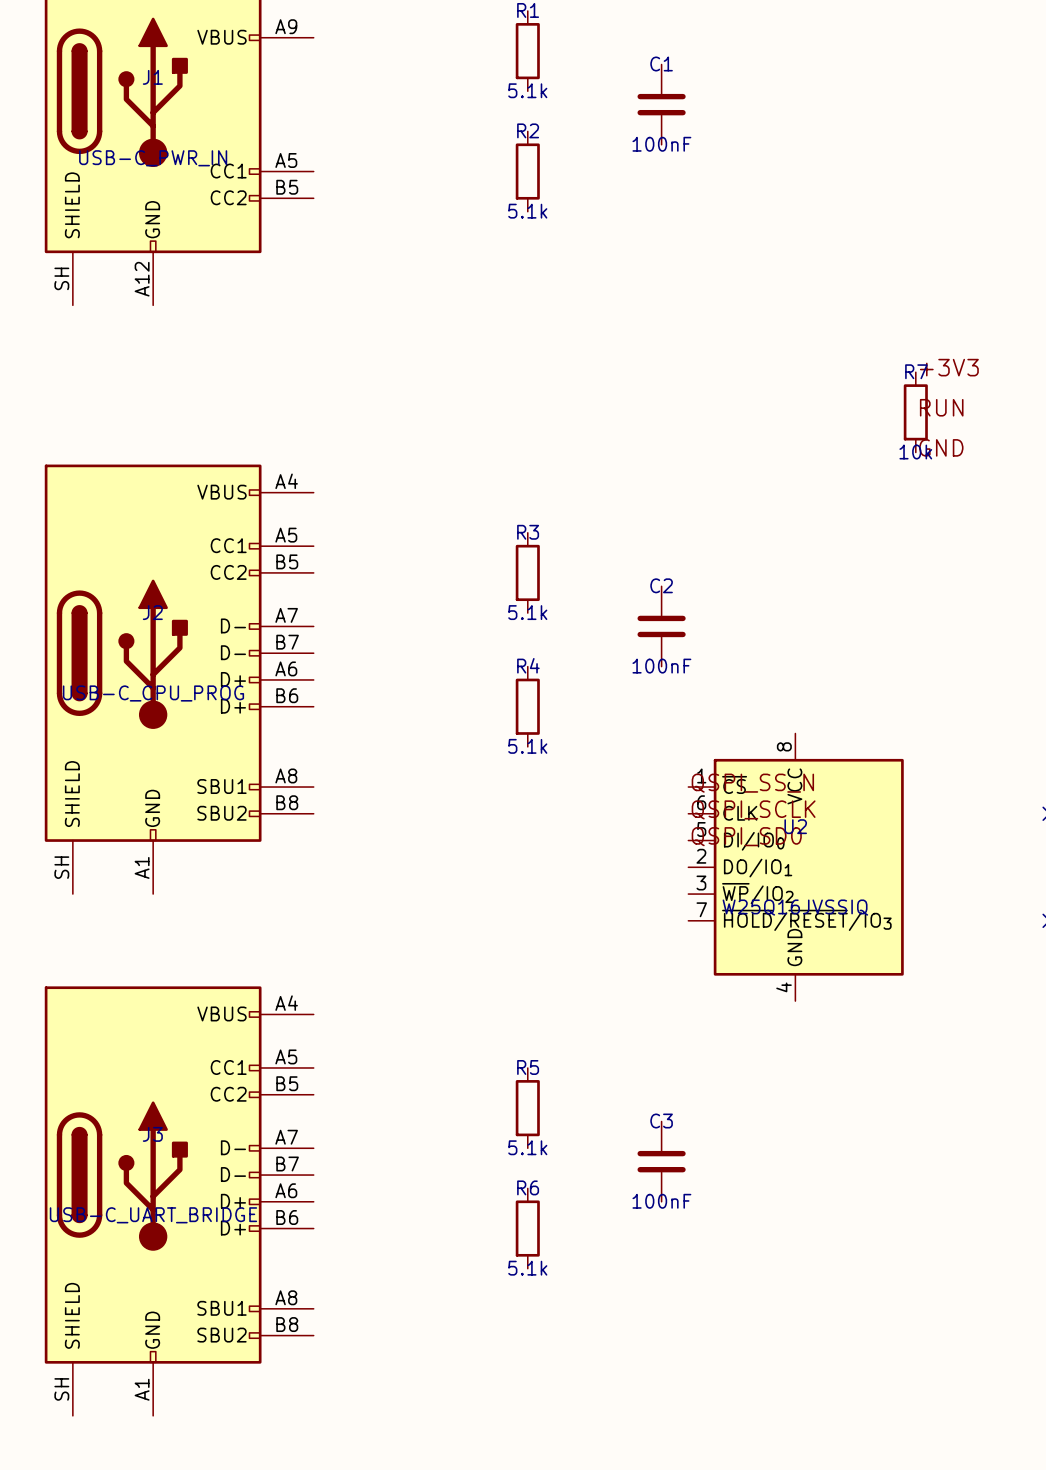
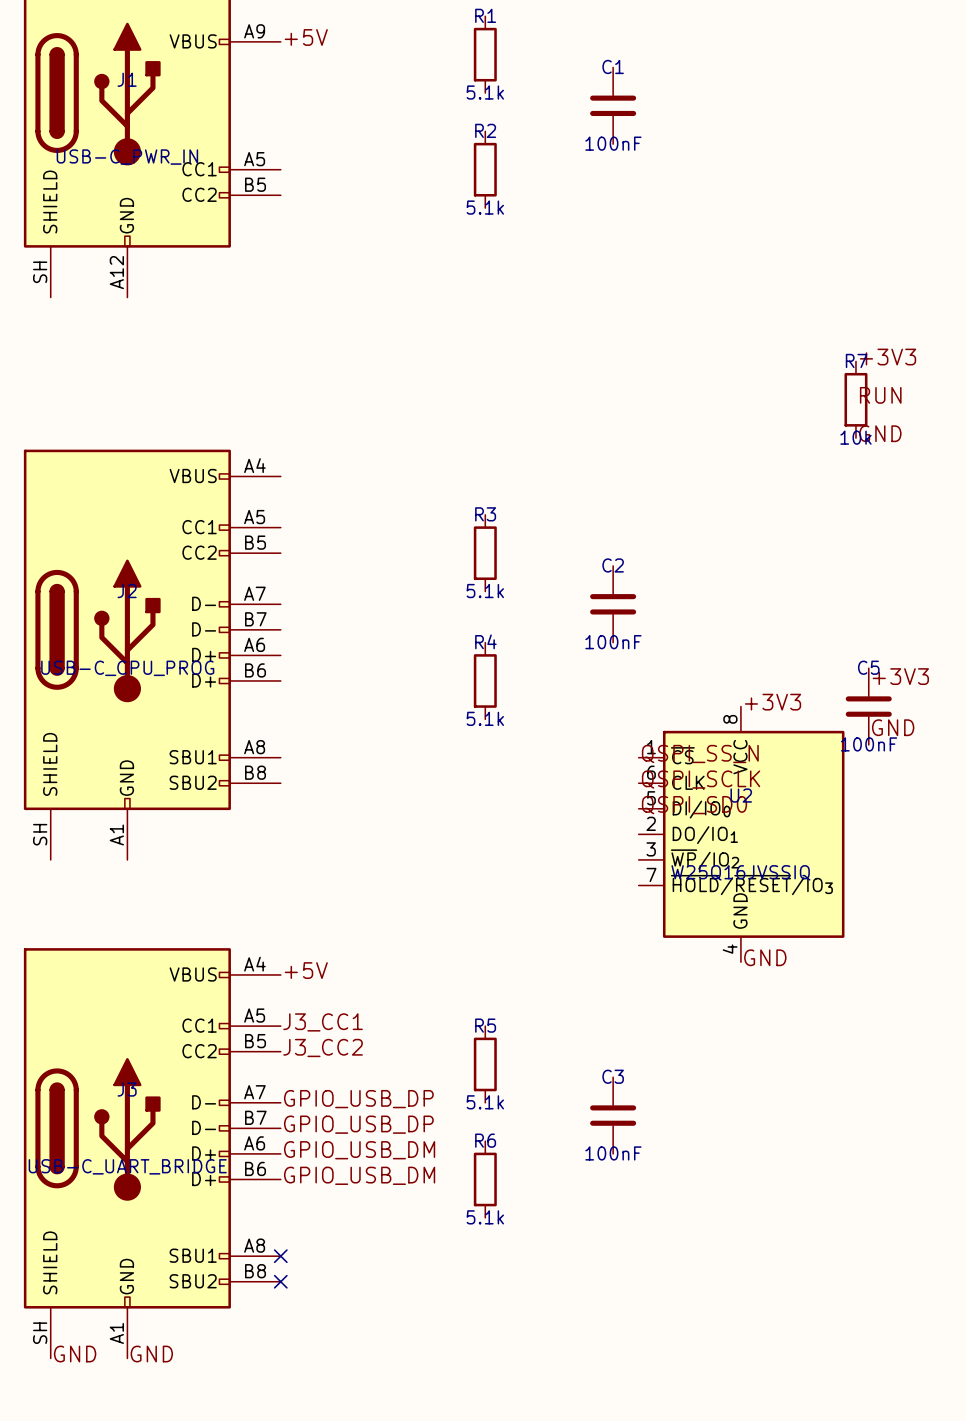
label: none -> +5V (306, 37)
label: none -> +3V3 (900, 676)
label: none -> +3V3 (772, 702)
C5: none -> 100nF (868, 706)
label: none -> GND (893, 727)
label: none -> GND (765, 957)
label: none -> +5V (306, 970)
label: none -> J3_CC1 (323, 1022)
label: none -> J3_CC2 (323, 1047)
label: none -> GPIO_USB_DP (358, 1099)
label: none -> GPIO_USB_DP (358, 1124)
label: none -> GPIO_USB_DM (359, 1150)
label: none -> GPIO_USB_DM (359, 1175)
no-connect mark: none -> (280, 1256)
no-connect mark: none -> (280, 1281)
label: none -> GND (75, 1354)
label: none -> GND (151, 1354)

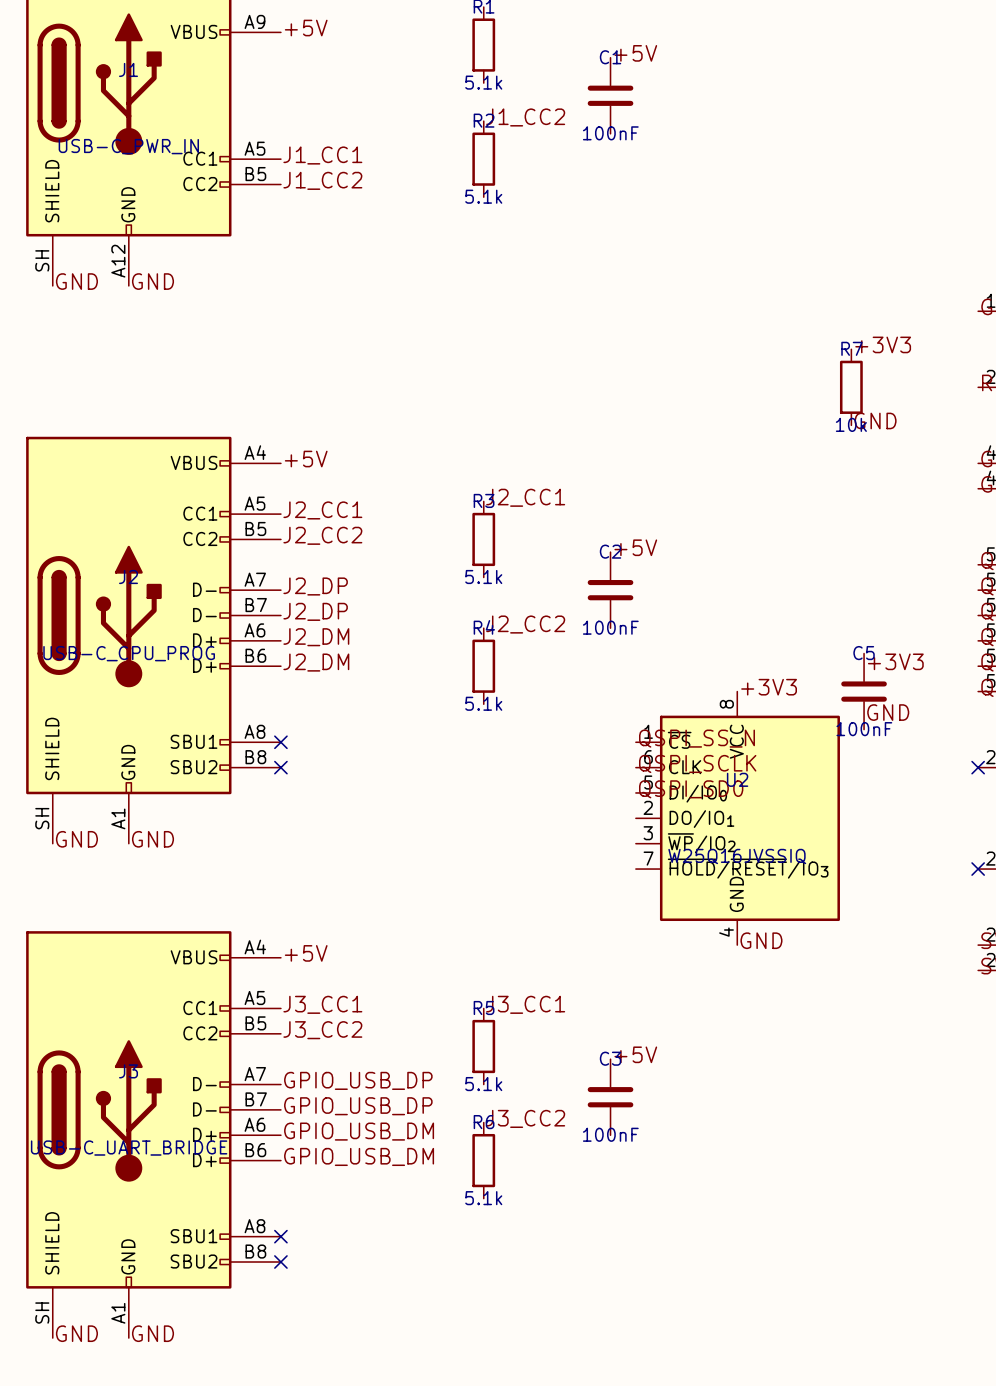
label: none -> +5V (635, 53)
label: none -> J1_CC2 (525, 117)
label: none -> J1_CC1 (322, 155)
label: none -> J1_CC2 (322, 180)
label: none -> GND (76, 281)
label: none -> GND (152, 281)
label: RUN (880, 395) -> none
label: none -> +5V (306, 459)
label: none -> J2_CC1 (525, 497)
label: none -> J2_CC1 (322, 510)
label: none -> J2_CC2 (322, 535)
label: none -> +5V (635, 547)
label: none -> J2_DP (315, 586)
label: none -> J2_DP (315, 611)
label: none -> J2_CC2 (525, 624)
label: none -> J2_DM (316, 637)
label: none -> J2_DM (316, 662)
no-connect mark: none -> (280, 742)
no-connect mark: none -> (280, 767)
label: none -> GND (76, 839)
label: none -> GND (152, 839)
label: none -> J3_CC1 (525, 1004)
label: none -> +5V (635, 1054)
label: none -> J3_CC2 (525, 1118)

